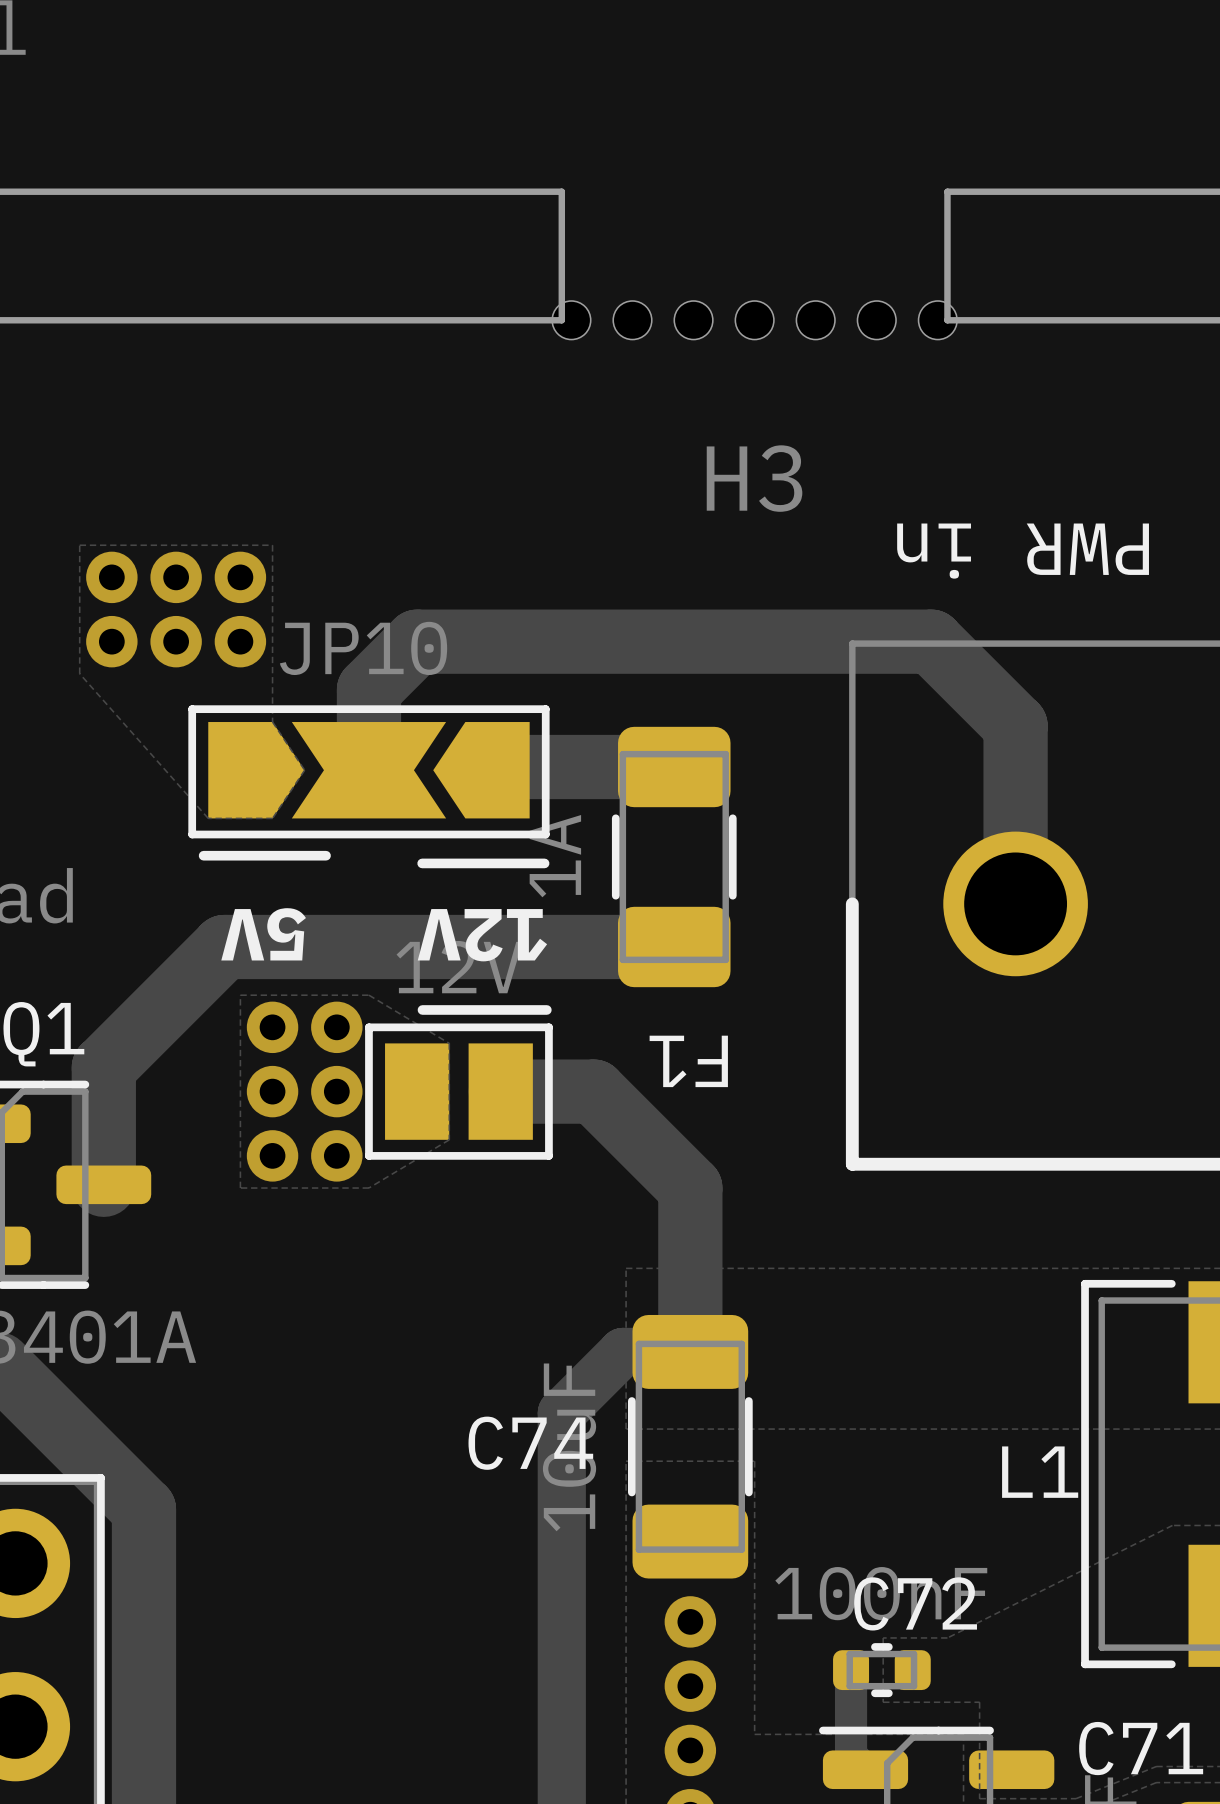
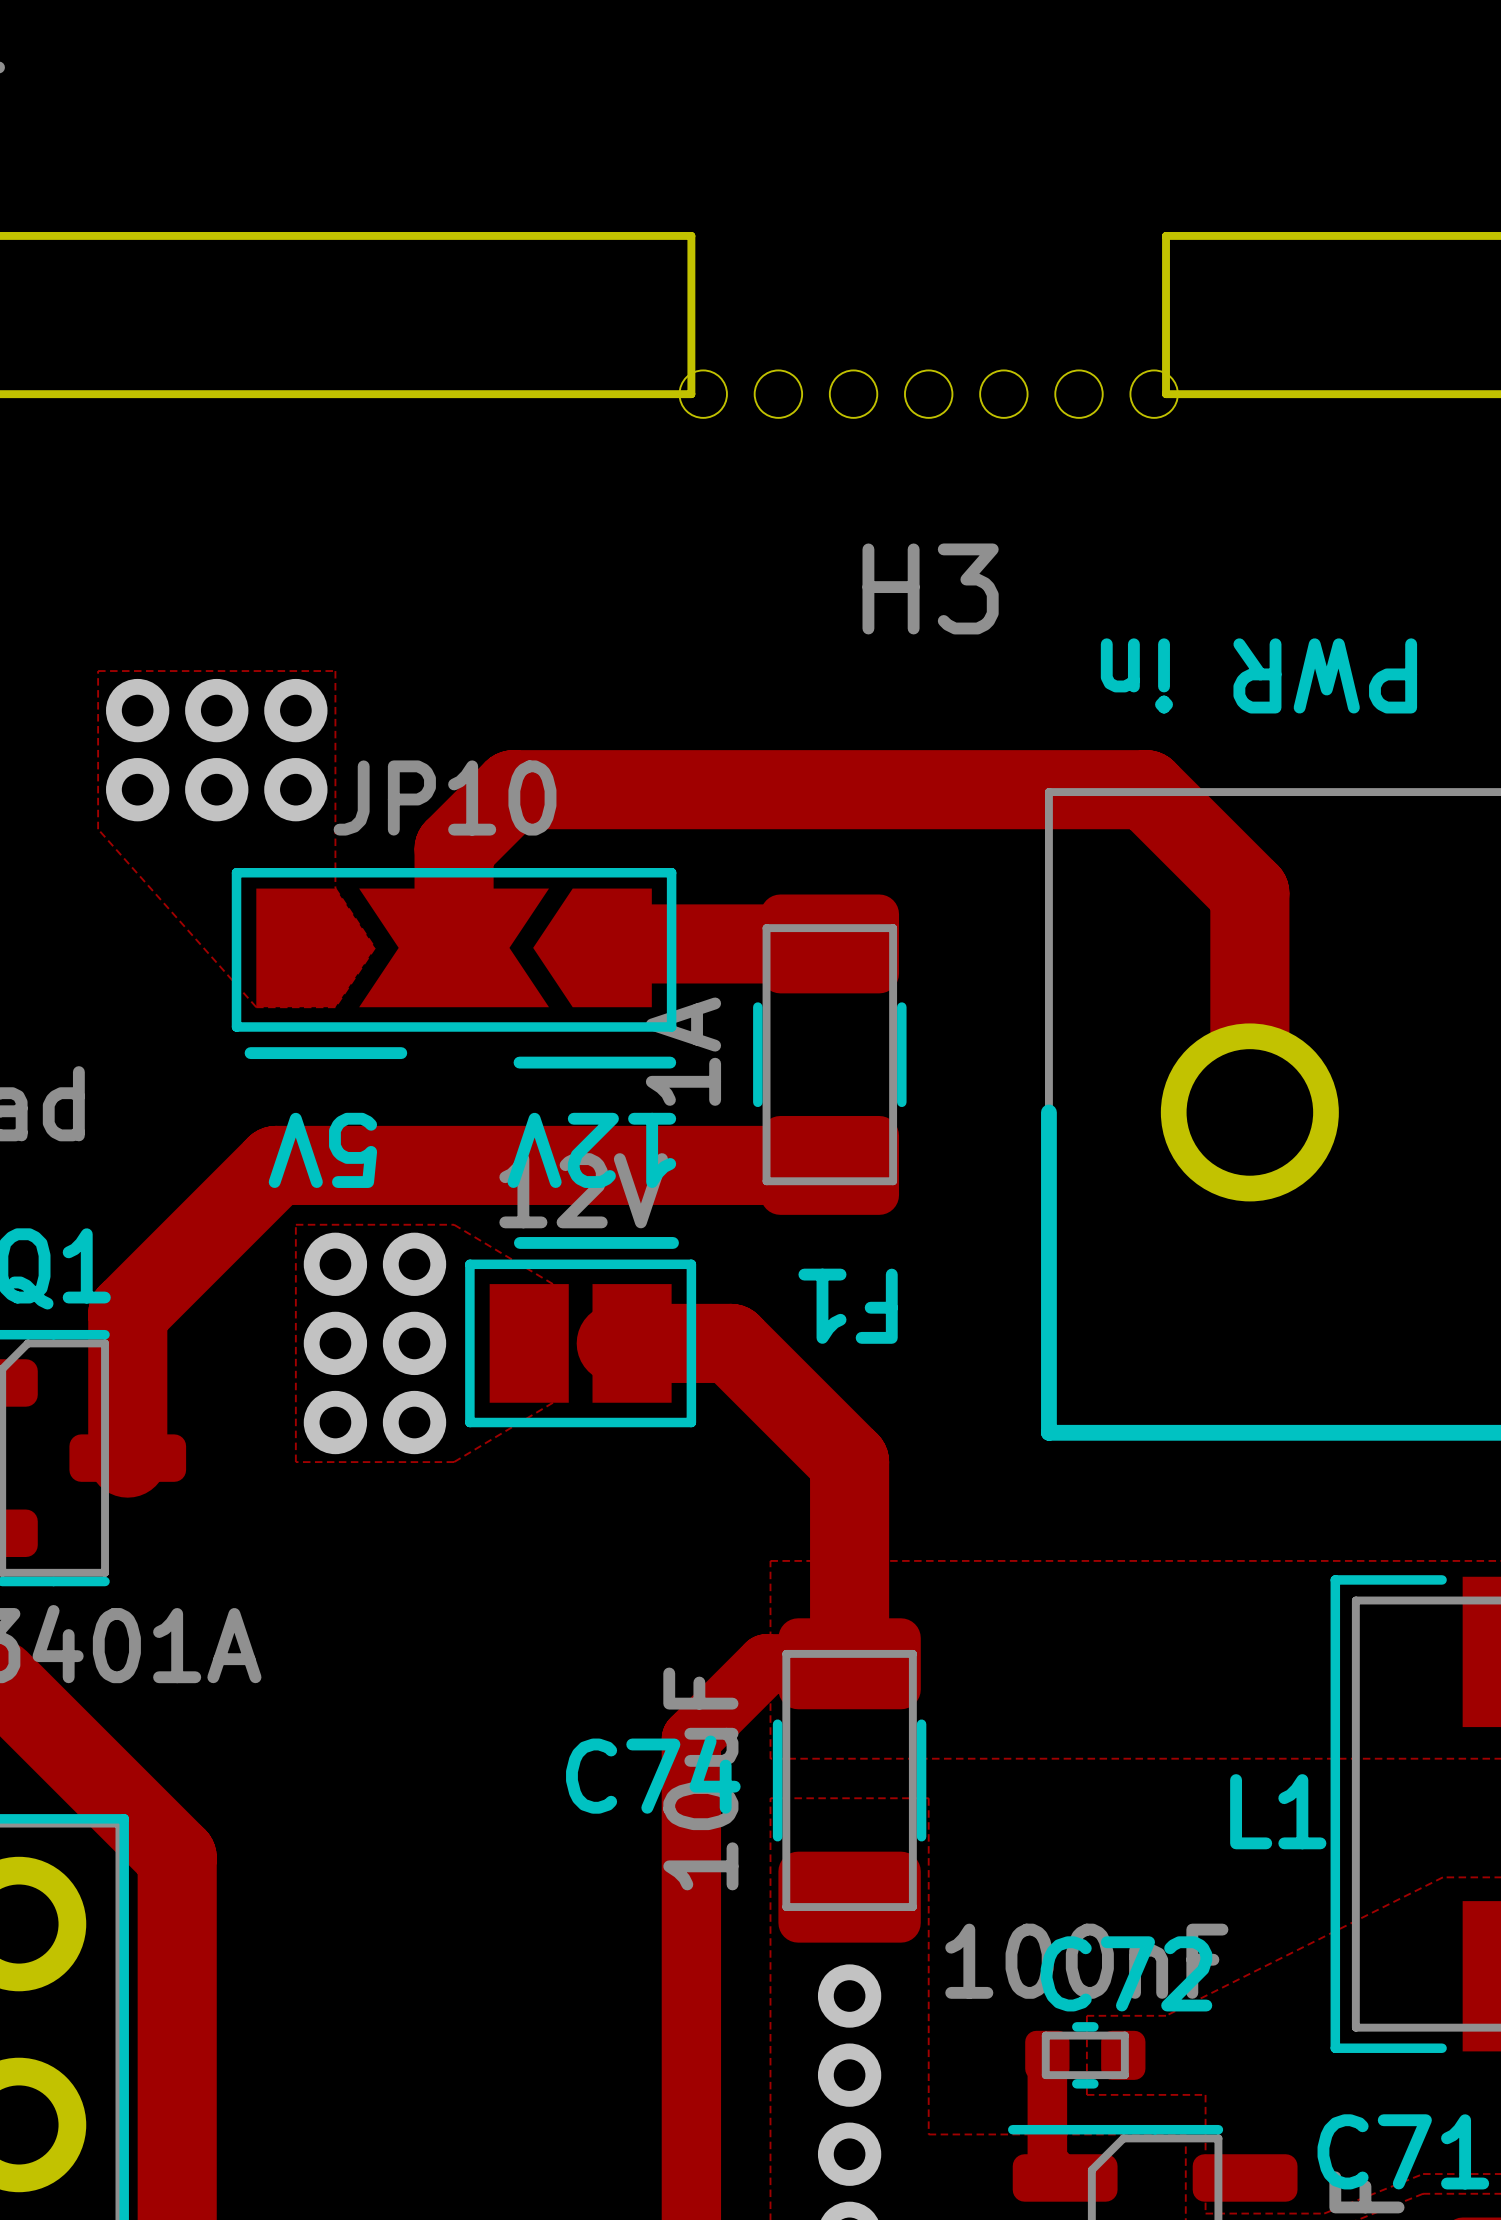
part position: (458, 1091) -> (580, 1343)

